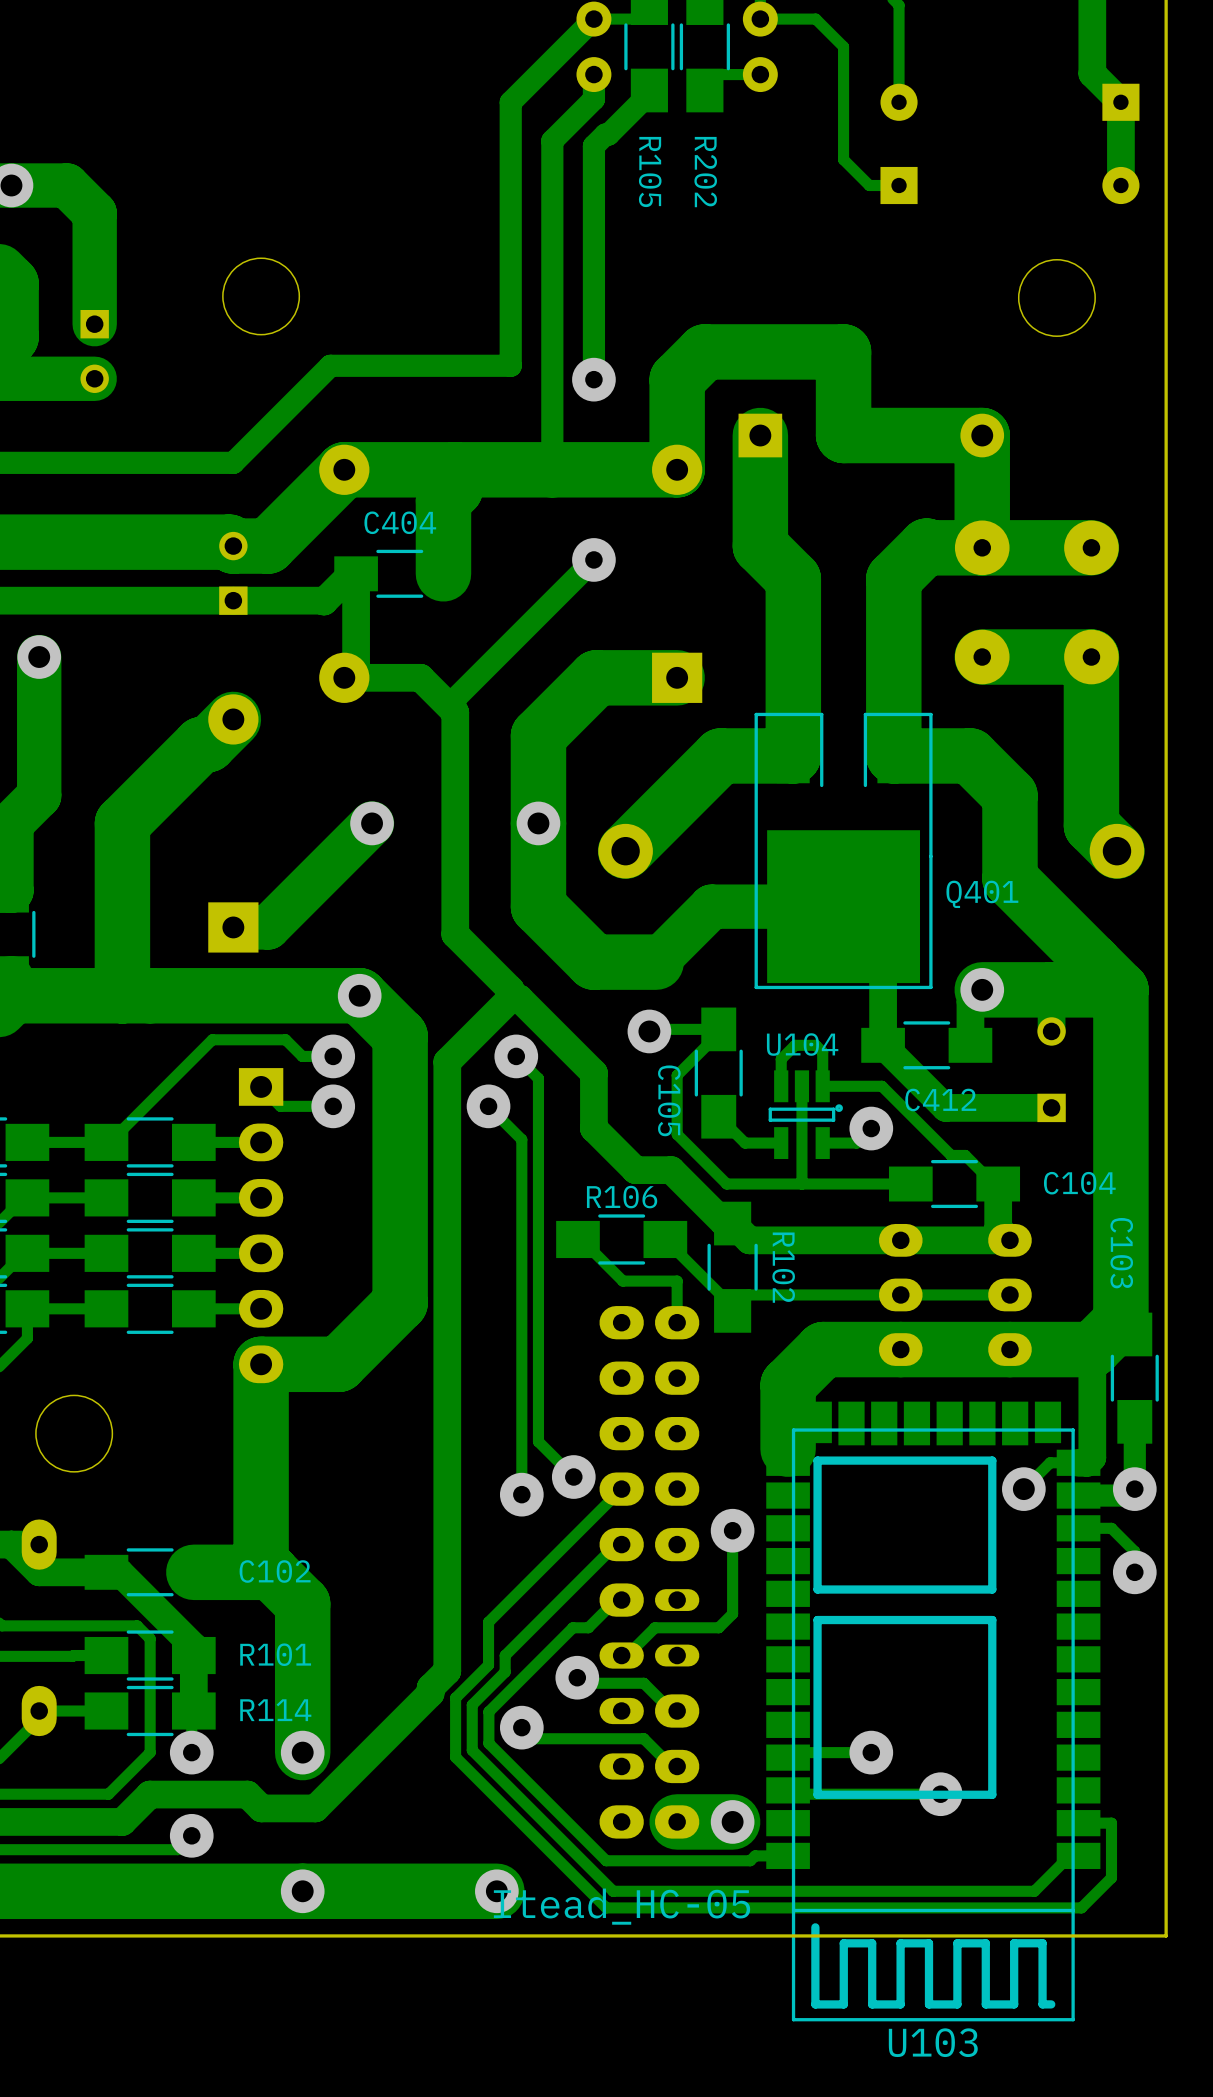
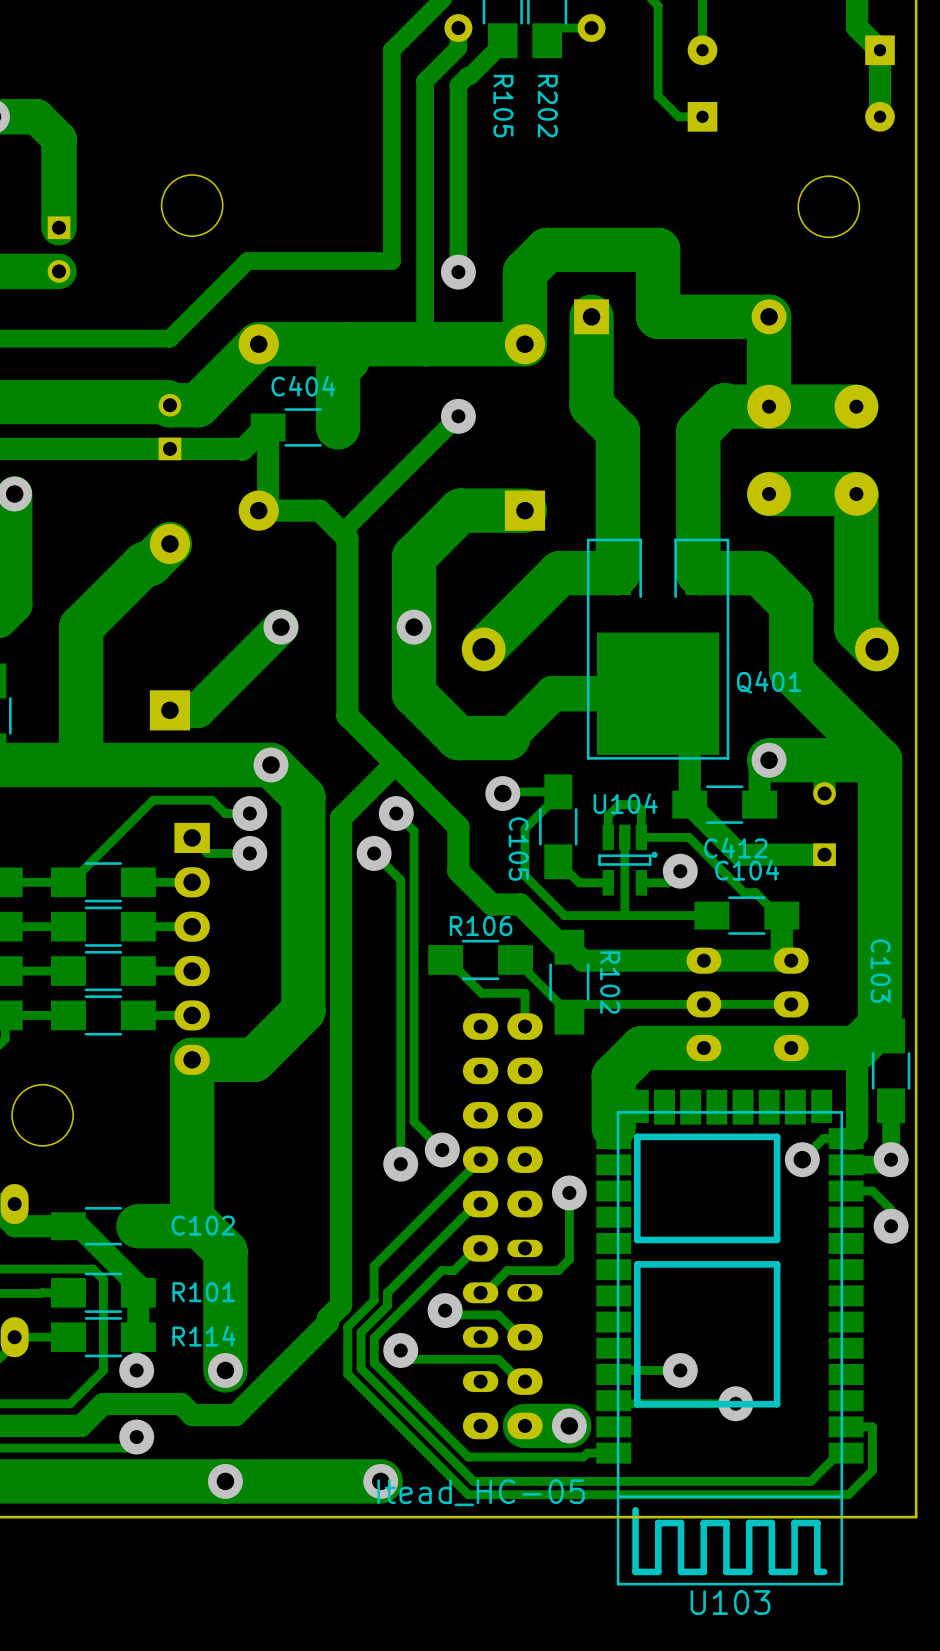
C104 name position: C104 (1079, 1183) -> C104 (747, 870)

